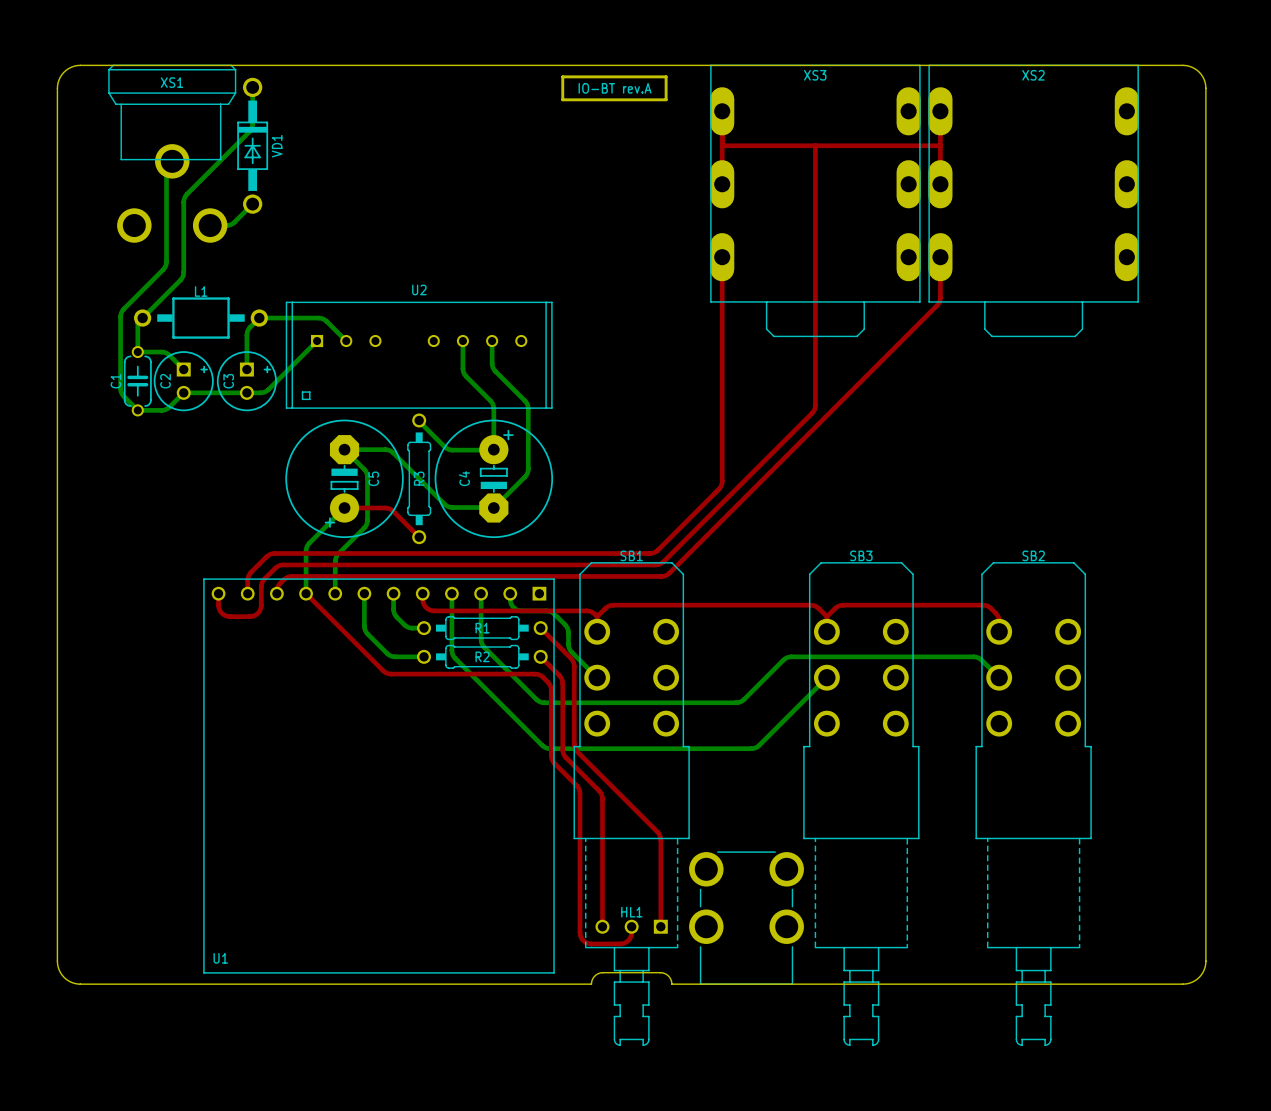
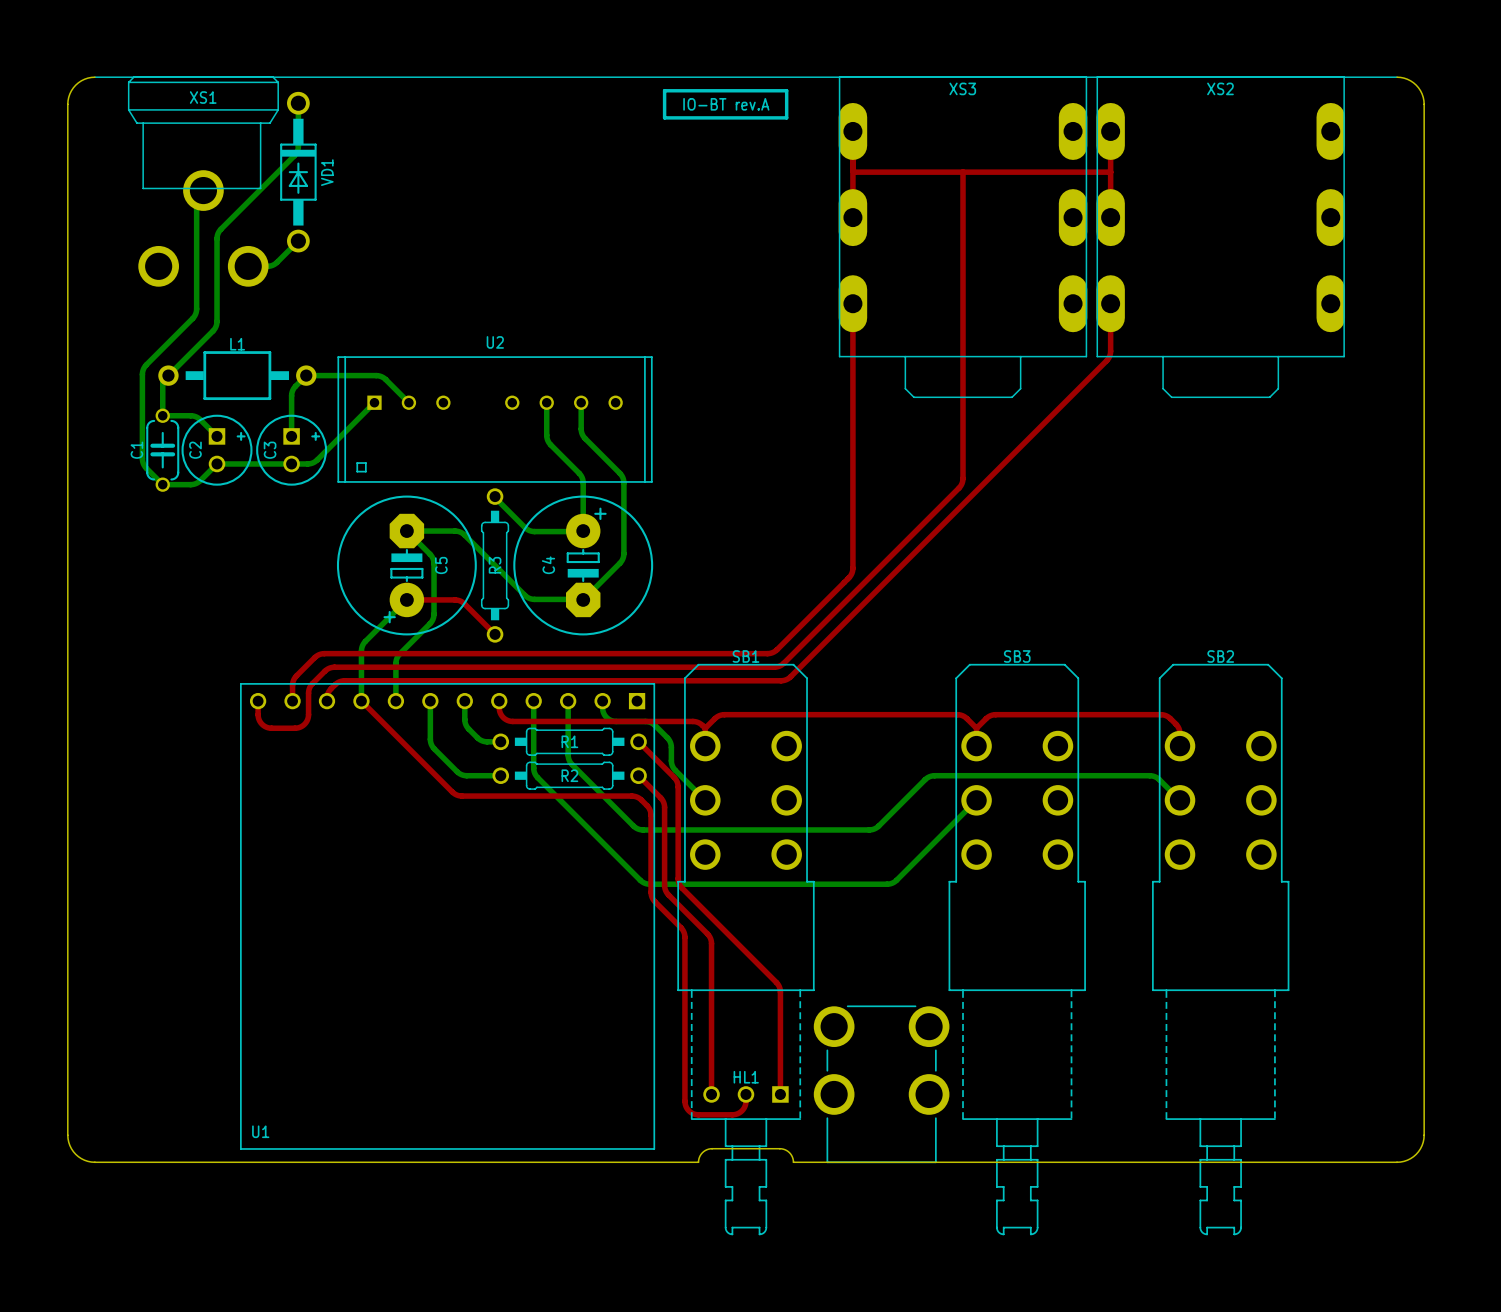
board edge: (80, 65) (1182, 65) -> none
line: none -> (94, 77) (1397, 77)
board edge: (562, 76) (562, 99) (666, 99) (666, 76) (562, 76) -> none
line: none -> (664, 90) (664, 117) (786, 117) (786, 90) (664, 90)

